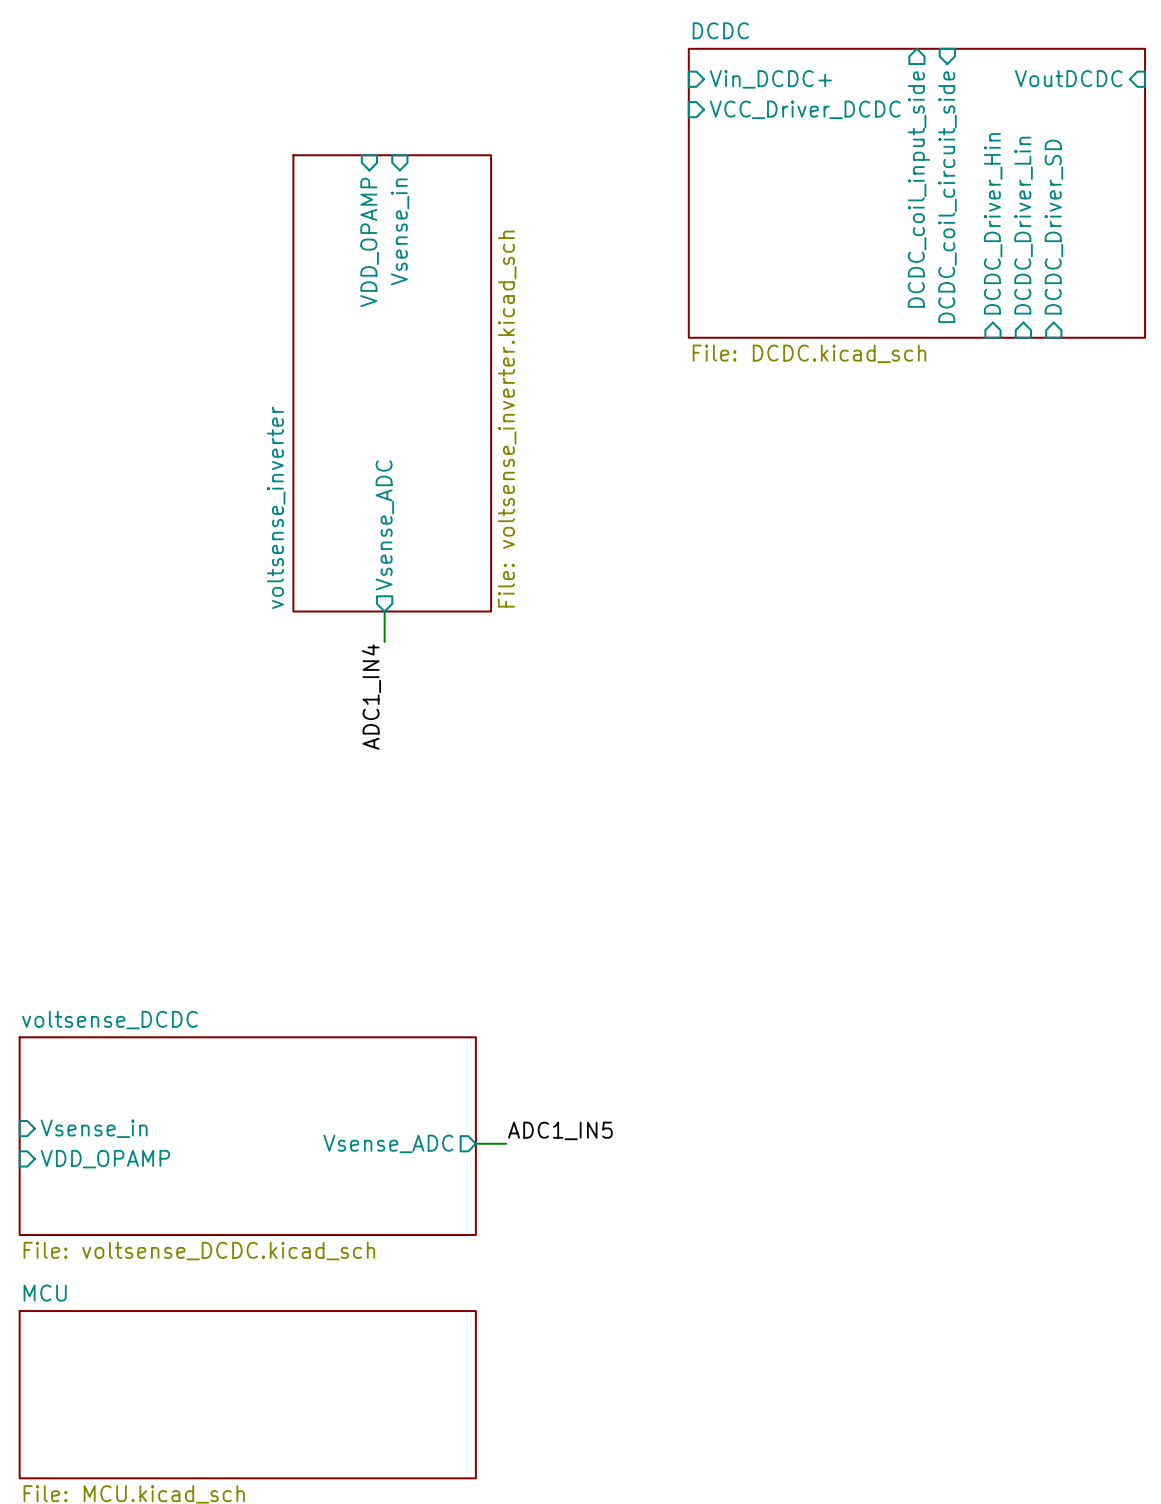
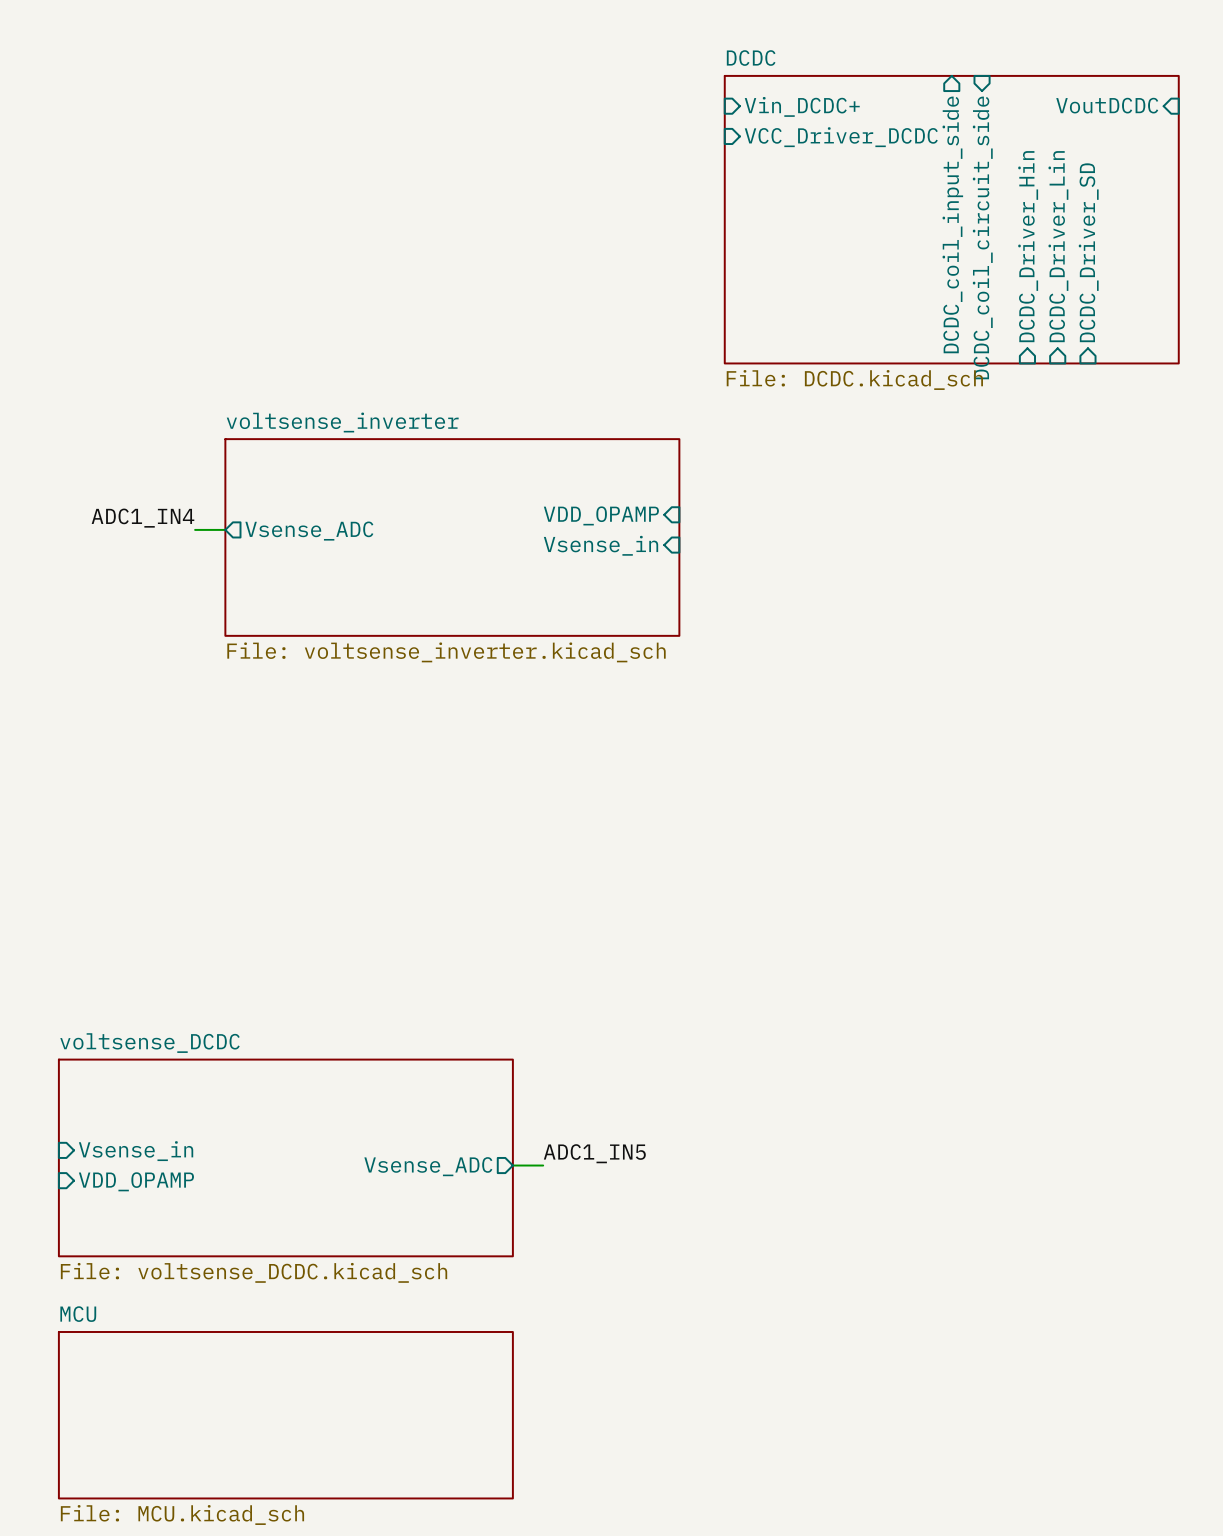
sheet pin: Vsense_in (400, 231) -> none
sheet pin: VDD_OPAMP (369, 242) -> none
sheet voltsense_inverter rotation: 0° (392, 383) -> 90° clockwise (452, 537)
sheet pin: none -> VDD_OPAMP (601, 515)
wire: none -> (195, 529) (225, 529)
sheet pin: none -> Vsense_in (601, 545)
sheet pin rotation: 0° (384, 525) -> 90° clockwise (309, 531)
wire: (384, 611) (384, 641) -> none
label rotation: 0° (371, 697) -> 90° clockwise (142, 518)
label position: ADC1_IN4 (371, 697) -> ADC1_IN4 (142, 518)

